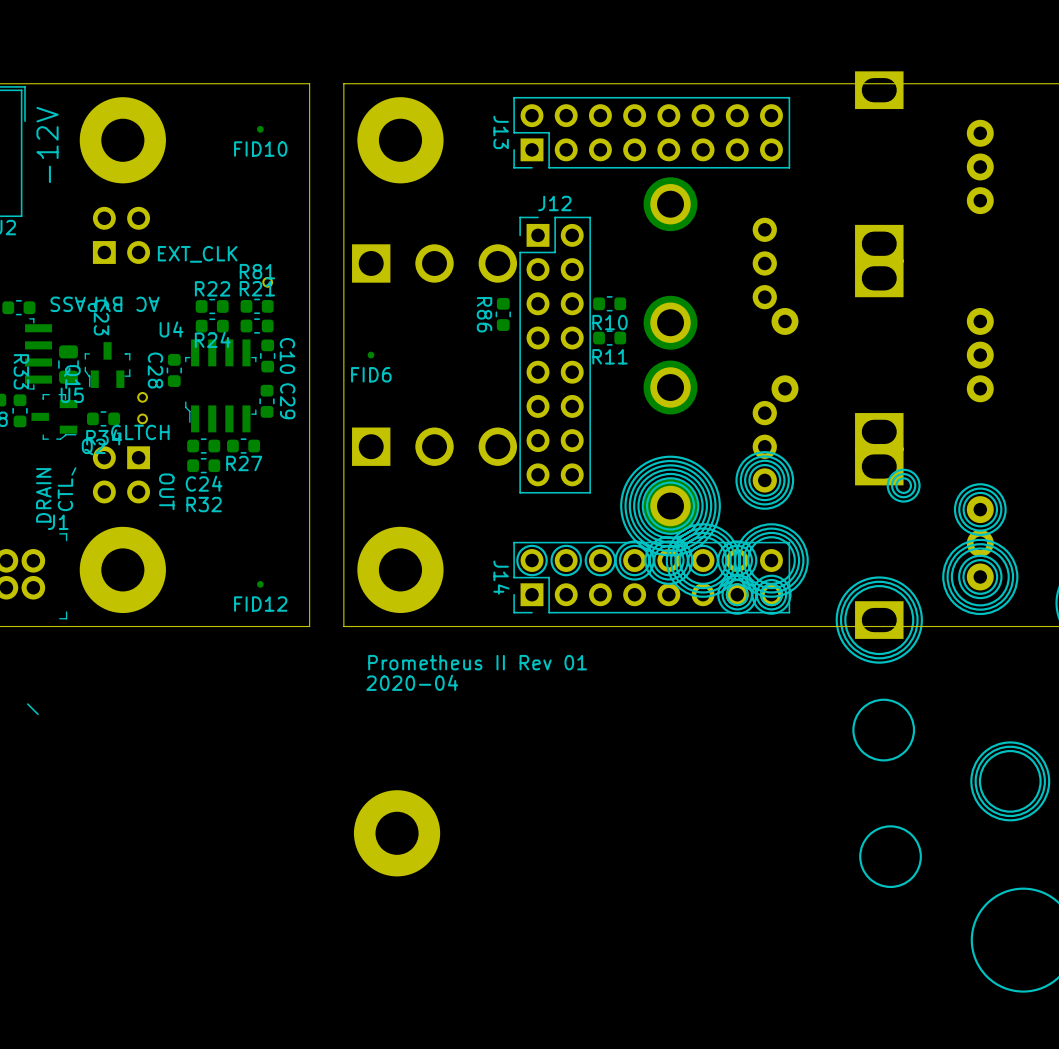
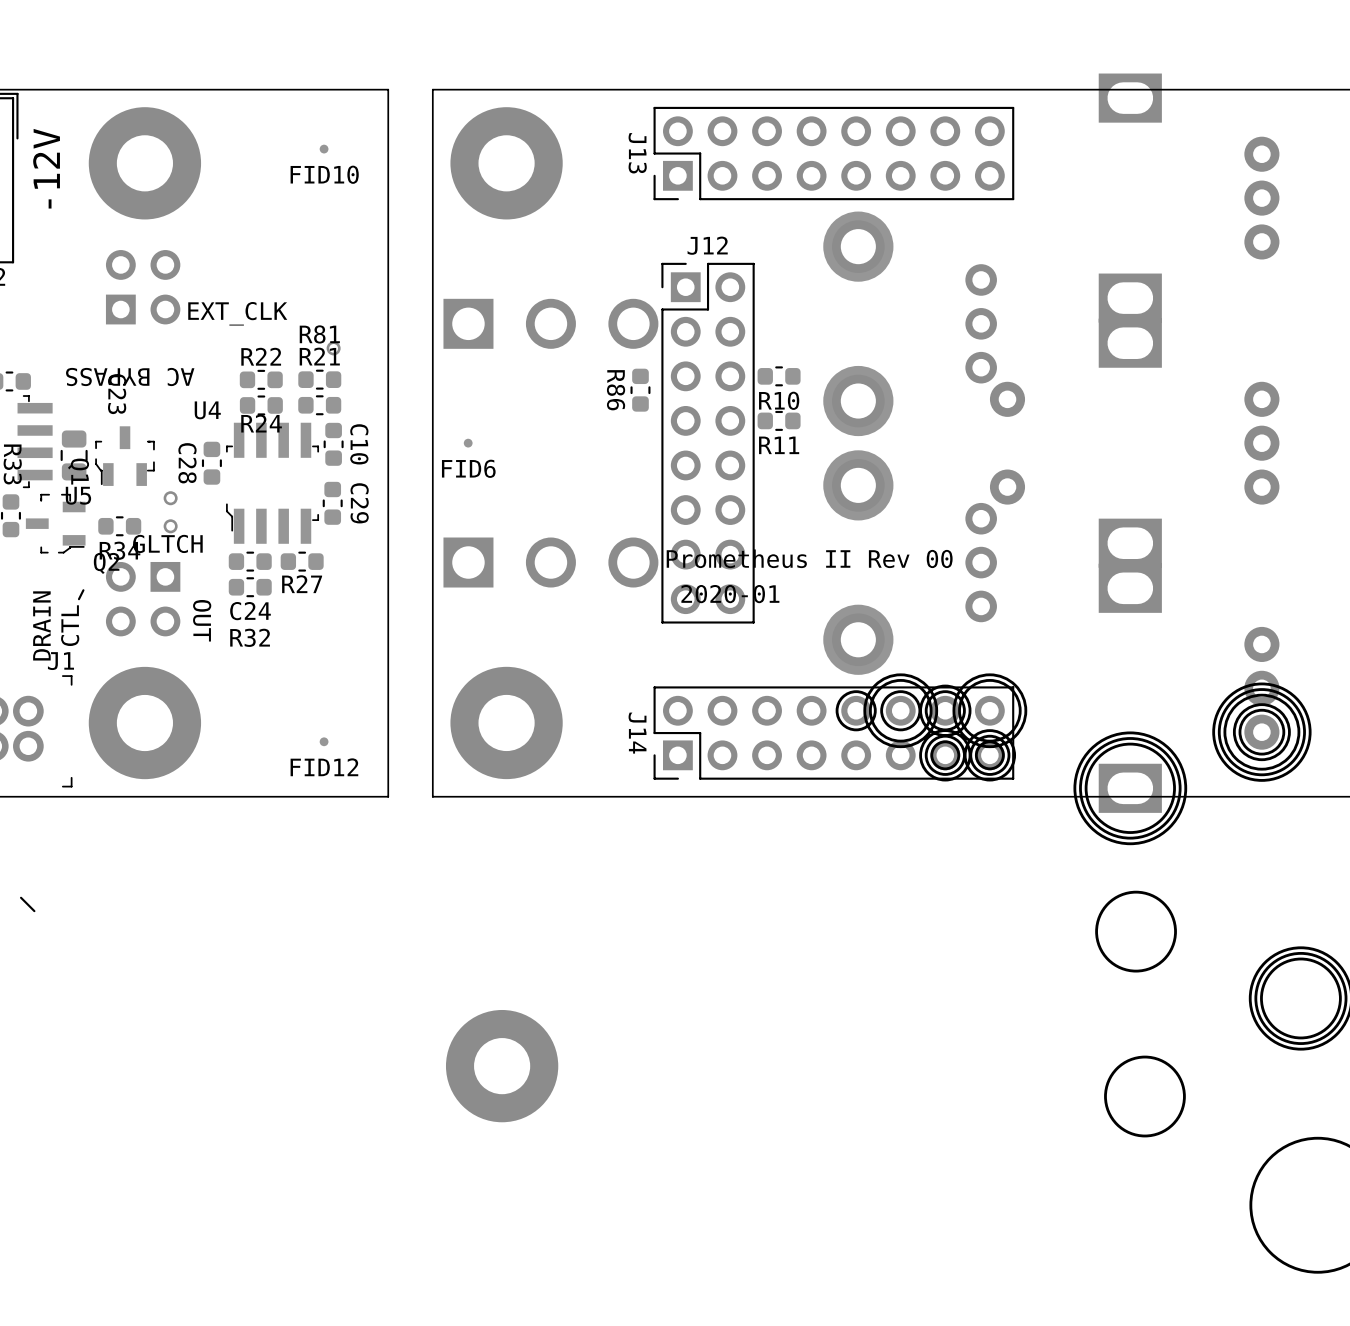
text: none -> Prometheus II Rev 00 (809, 558)
drawing: [516, 451, 809, 598] -> none
drawing: [886, 468, 921, 503] -> none
text: none -> 2020-01 (730, 594)
drawing: [953, 483, 1007, 537] -> none
text: Prometheus II Rev 01 (477, 662) -> none
text: 2020-04 (412, 682) -> none

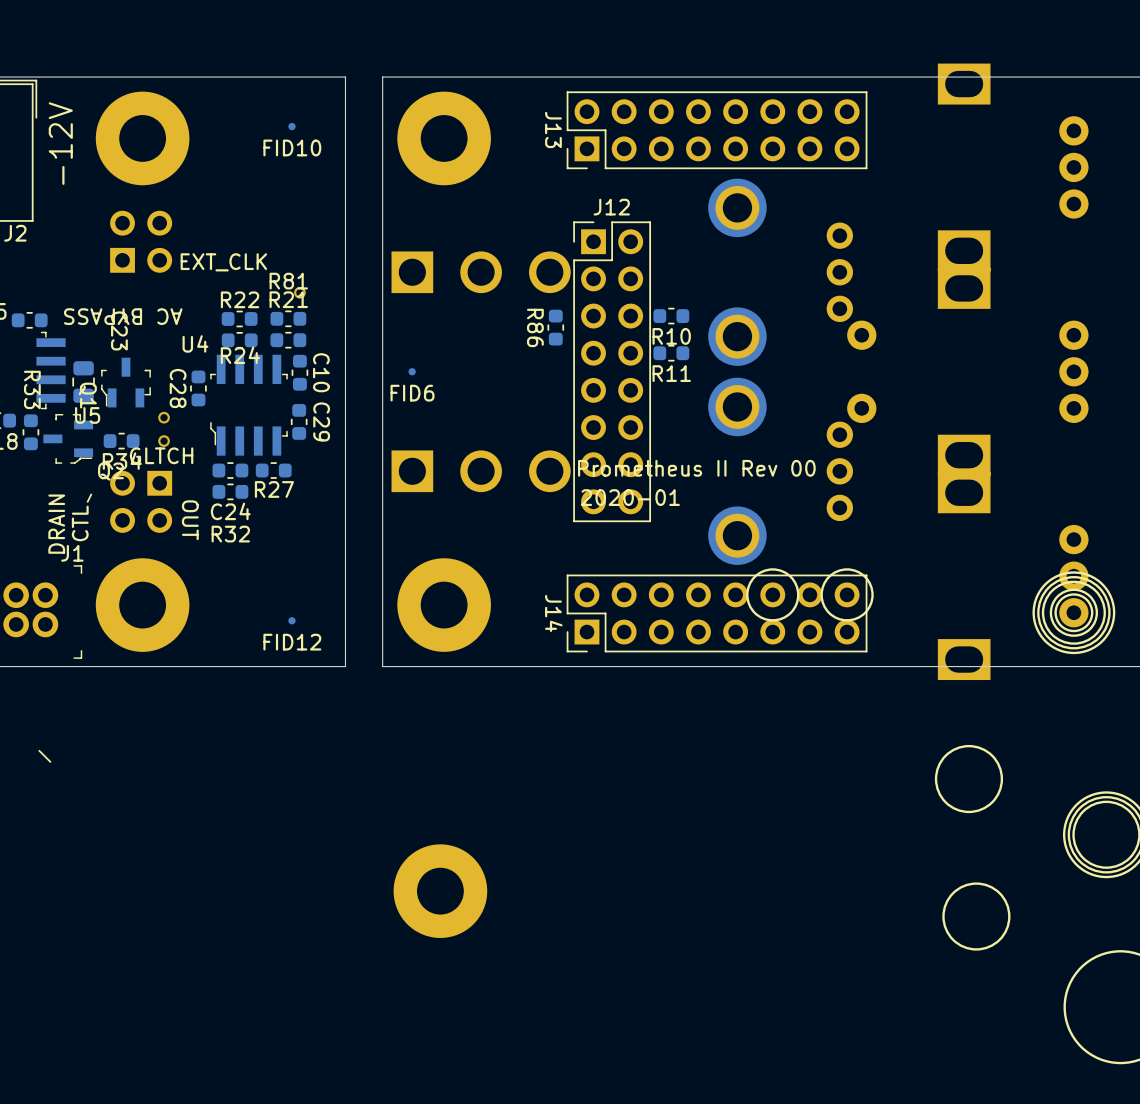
drawing: [835, 673, 1028, 782] -> none
drawing: none -> [746, 568, 800, 622]
drawing: none -> [820, 568, 874, 622]
drawing: [1073, 731, 1188, 846] -> none

